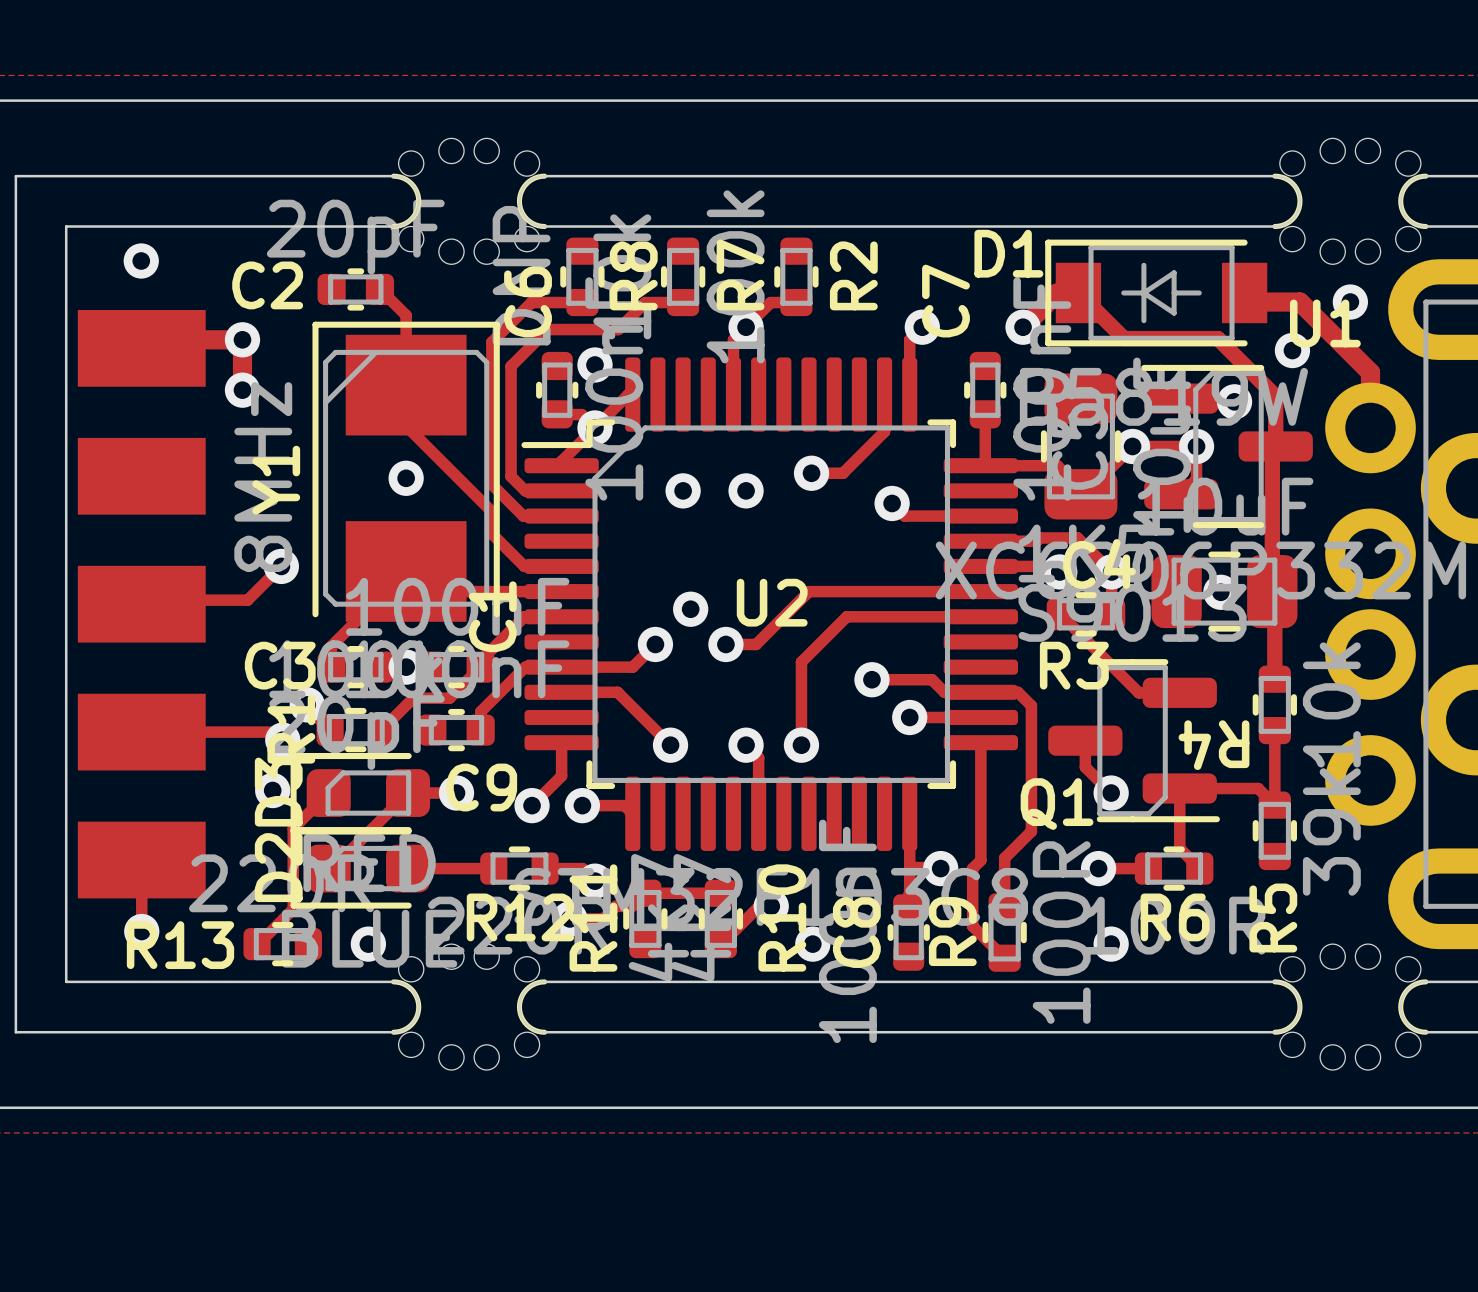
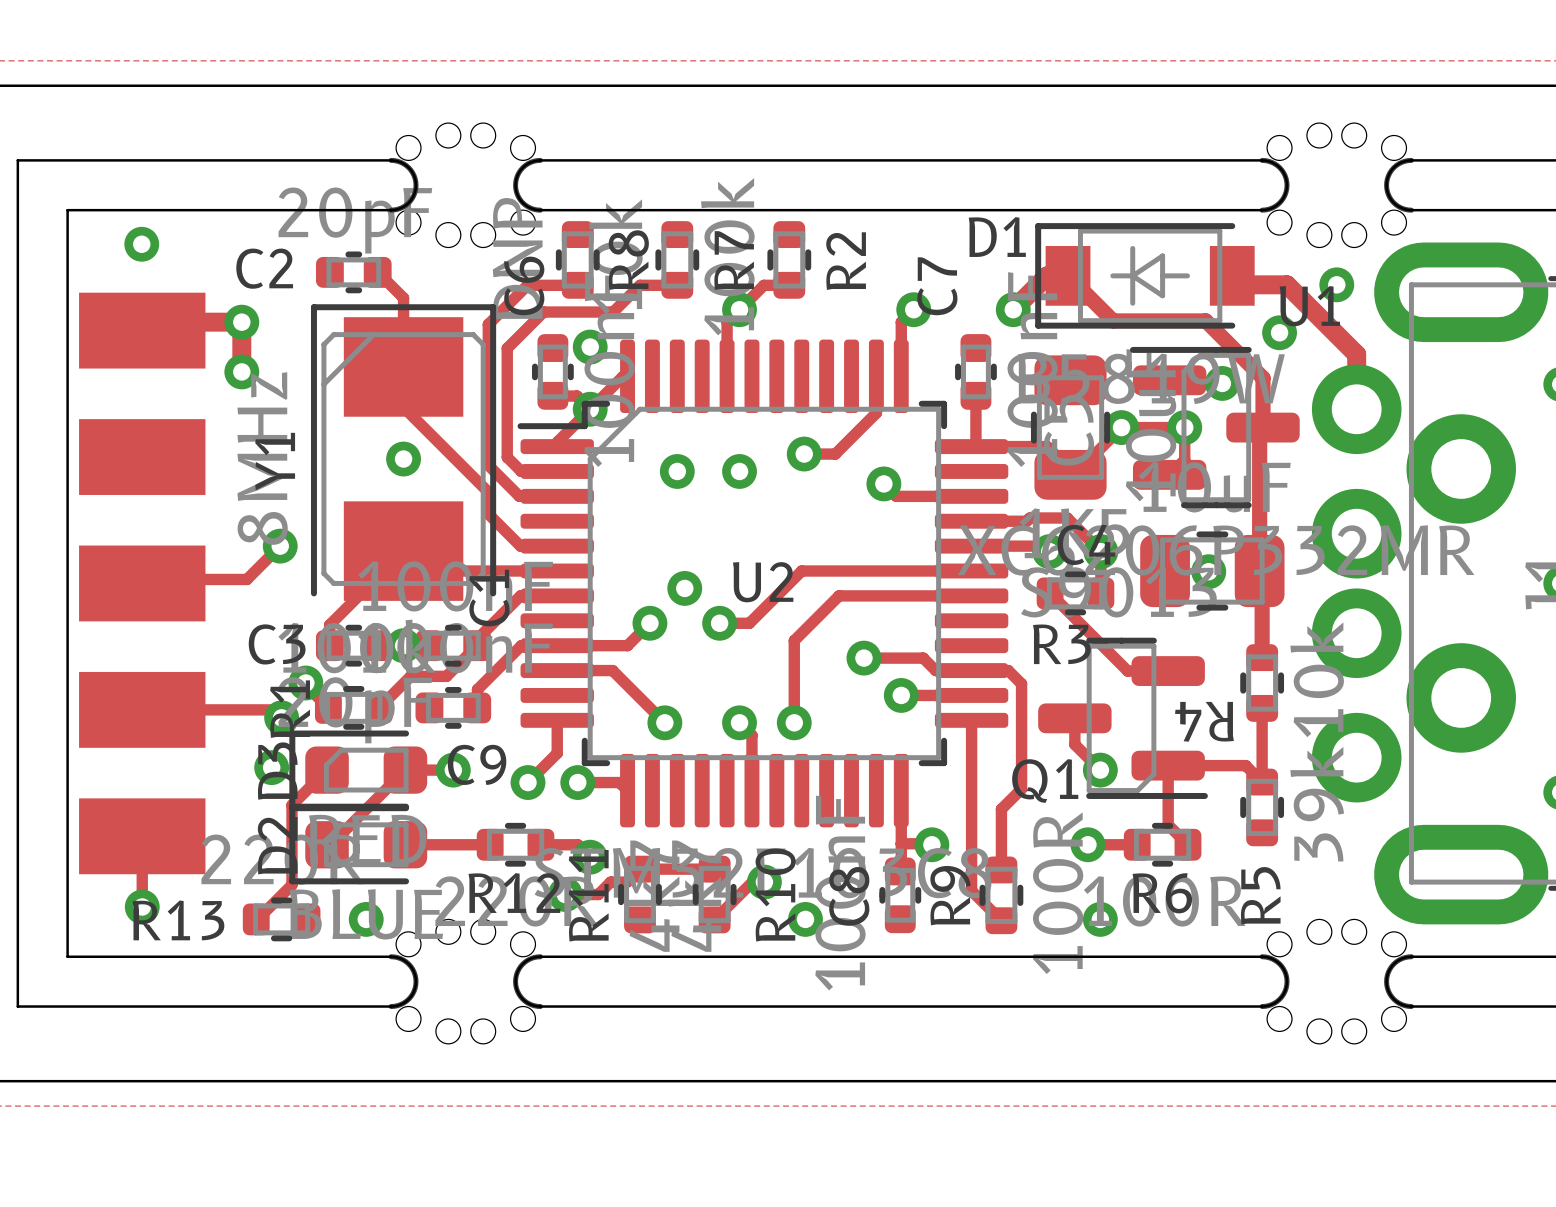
track: (1031, 812) (1031, 831) (1004, 858) (1004, 906) -> (1021, 789) (1001, 809) (1001, 869)
track: (980, 860) (972, 868) (972, 926) (1004, 958) -> (971, 836) (971, 890) (1001, 920)
C8 position: (908, 932) -> (900, 895)
R9 position: (1004, 932) -> (1001, 895)

